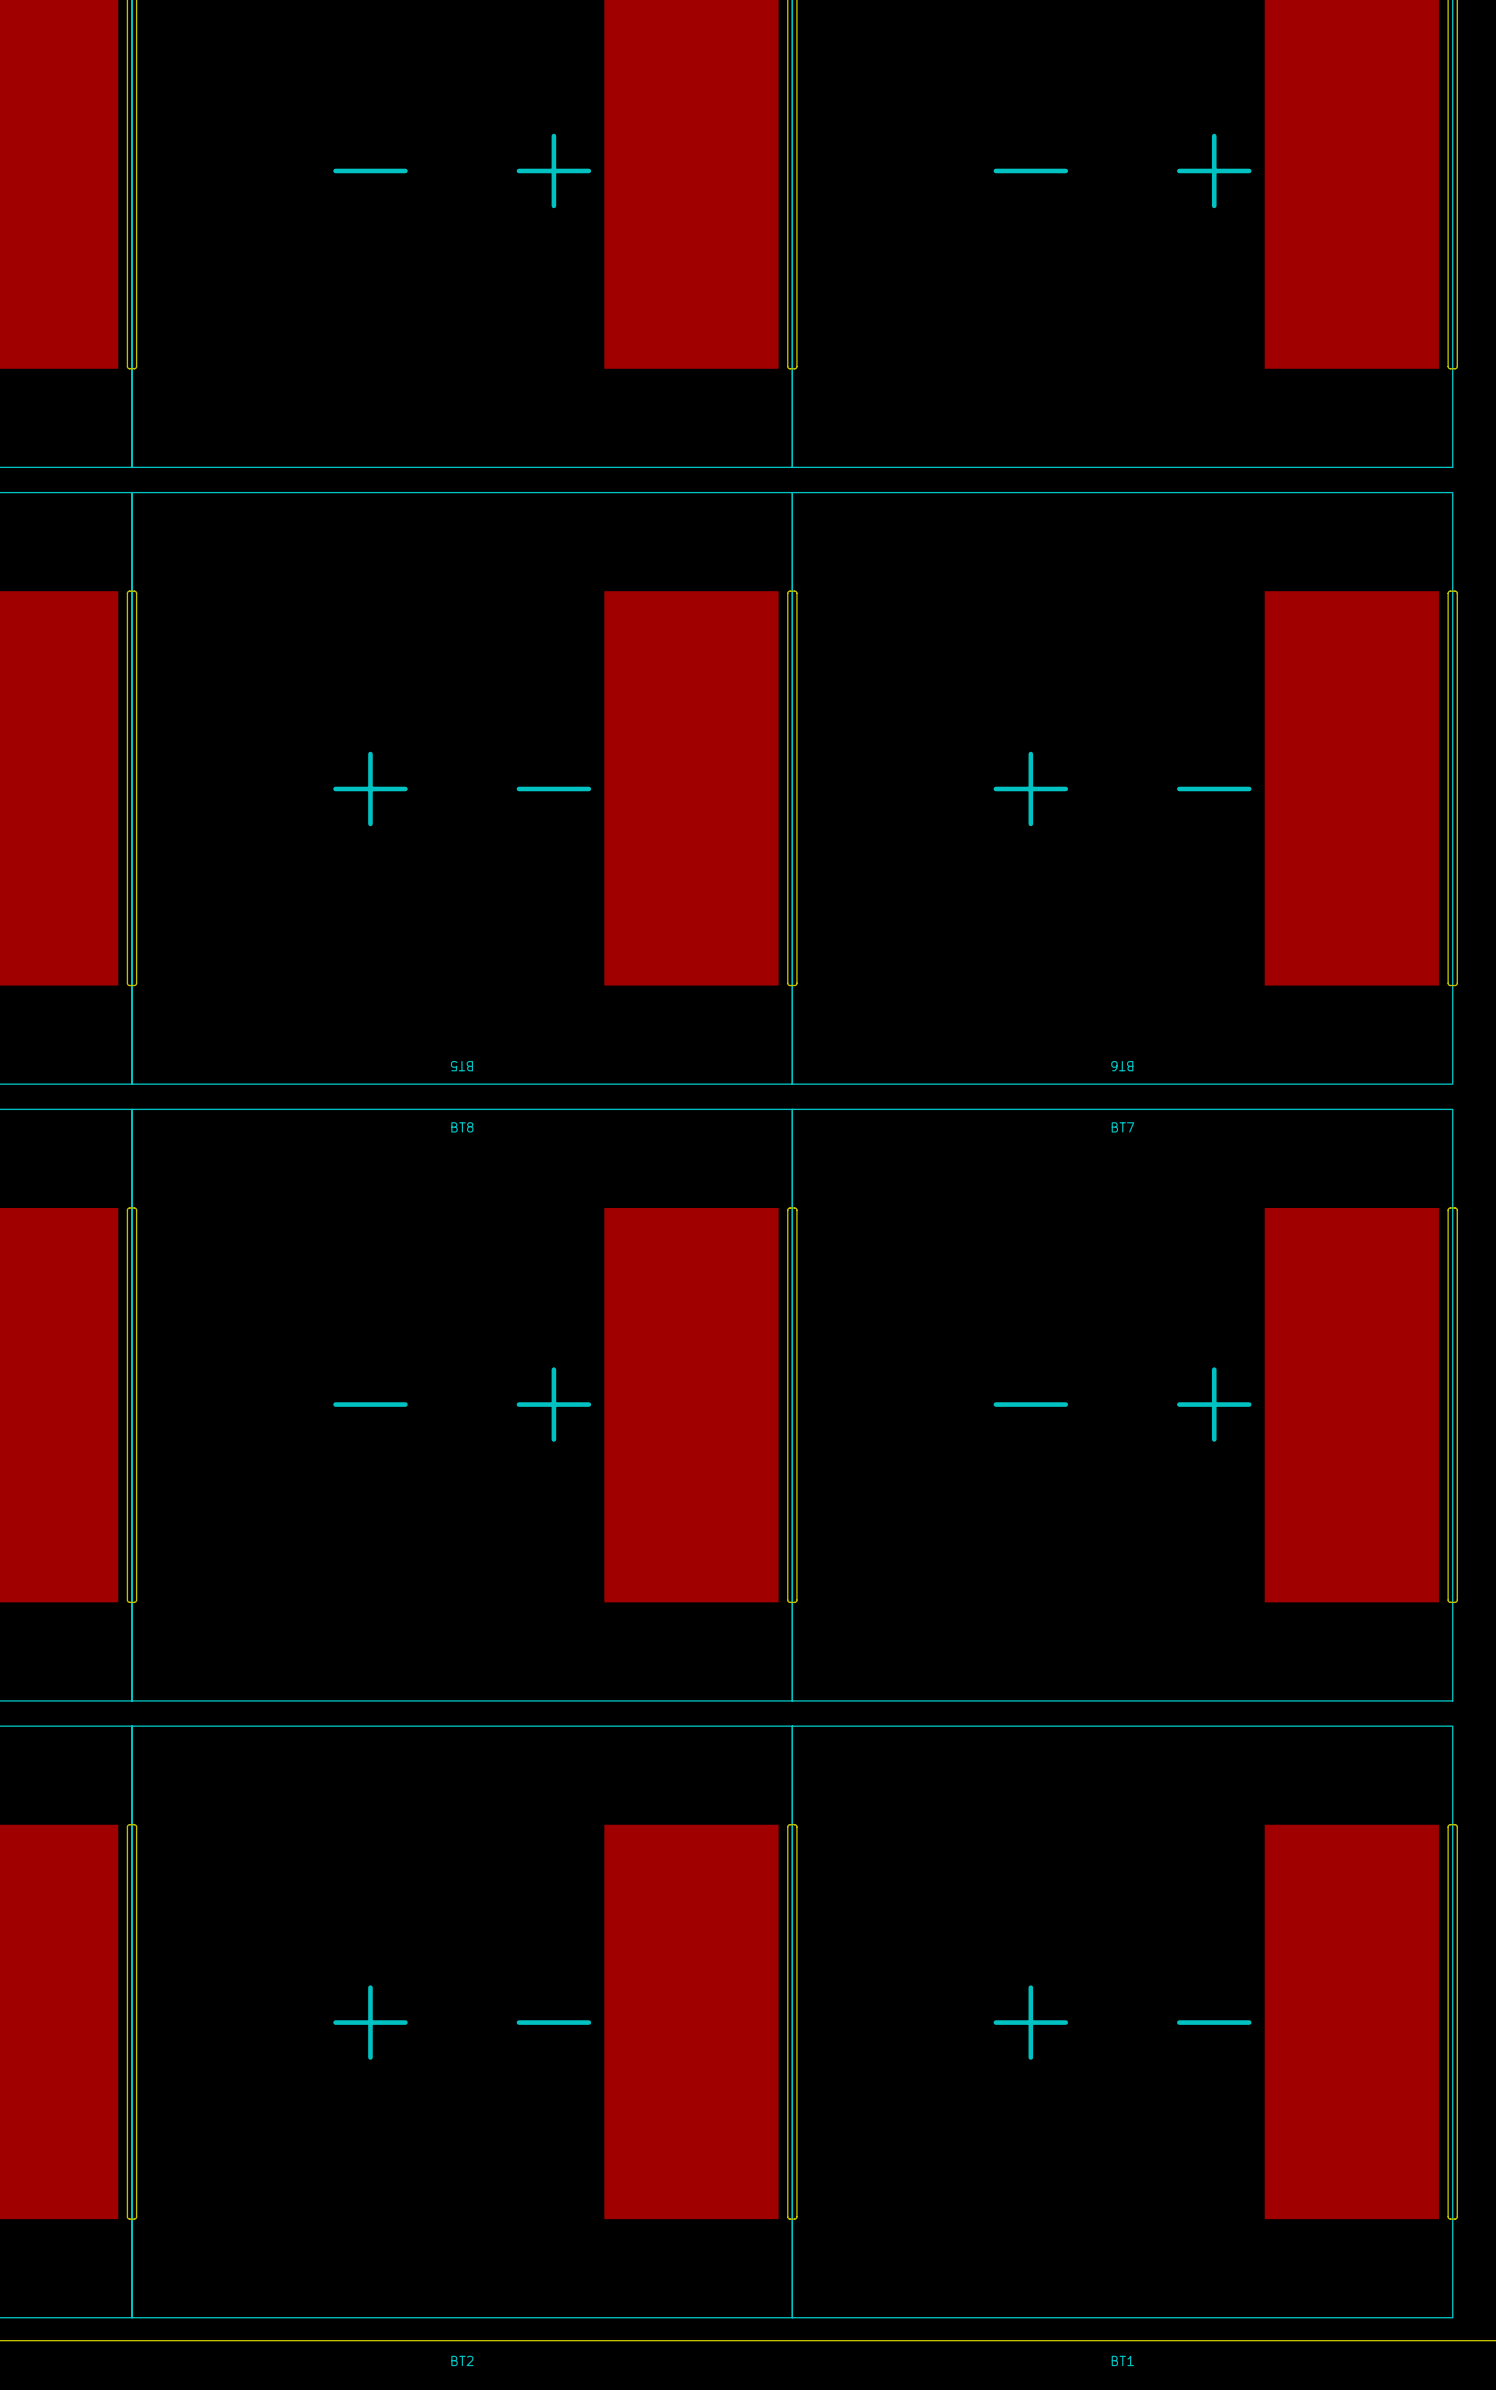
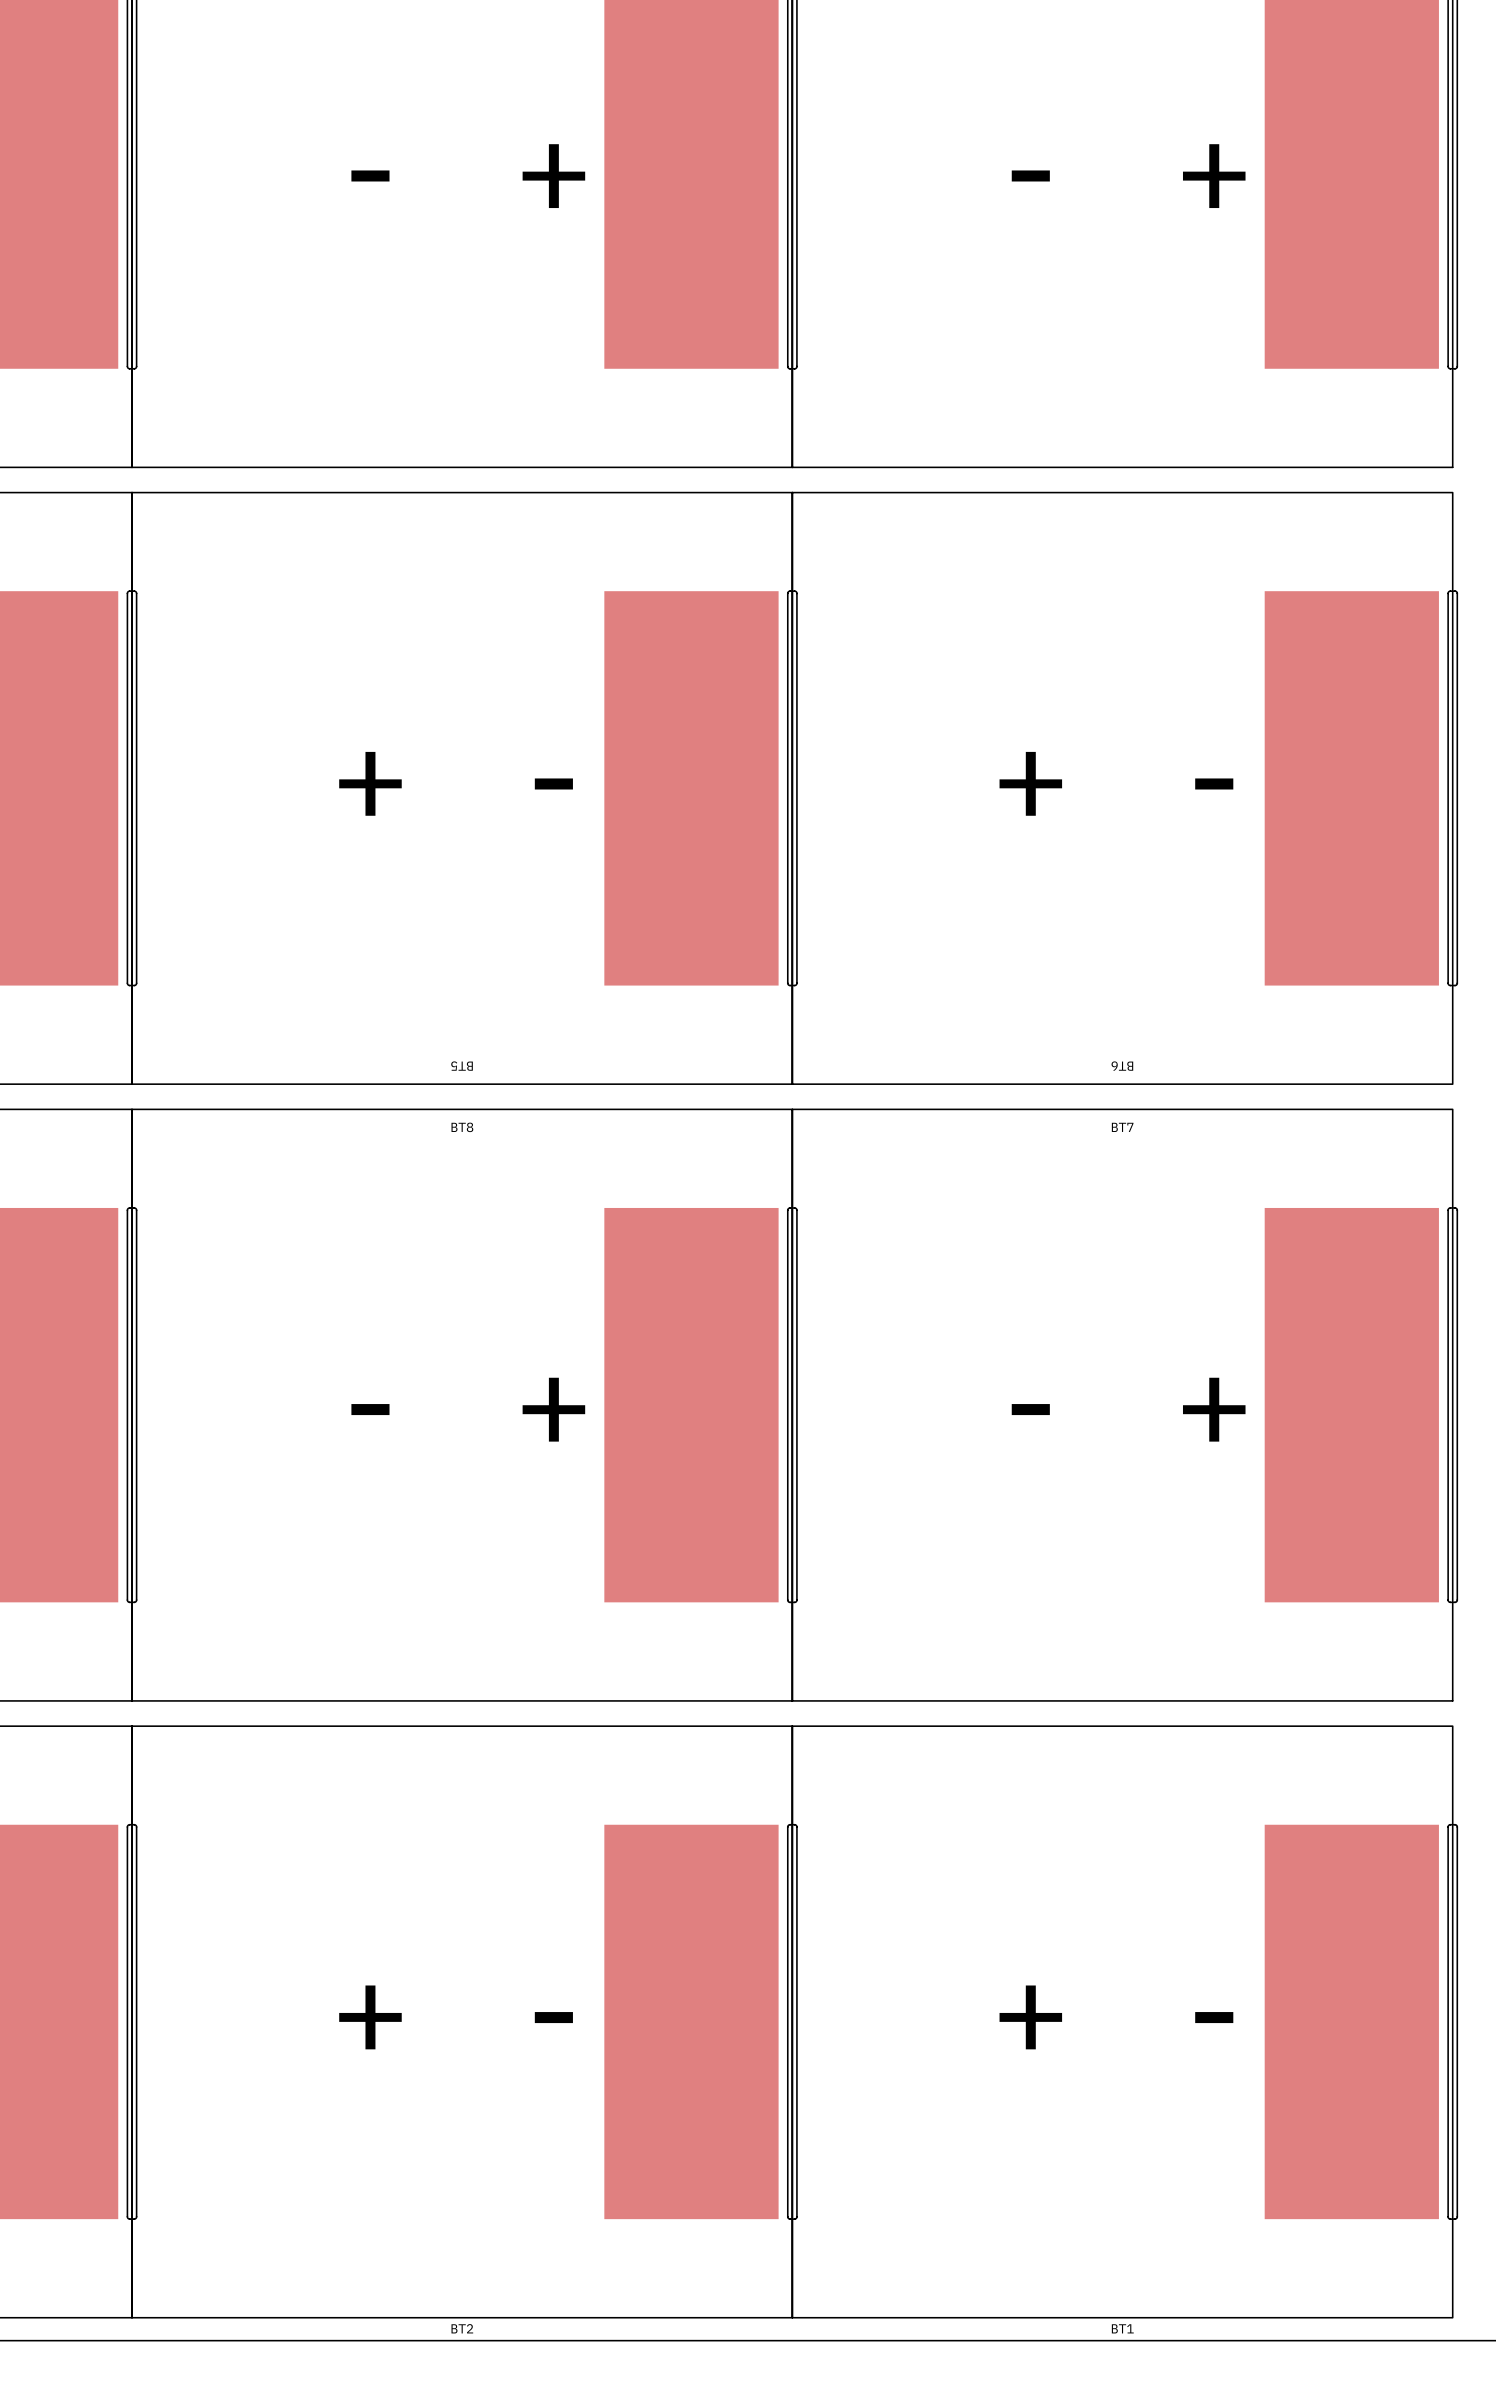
BT2 name position: BT2 (462, 2360) -> BT2 (462, 2328)
BT1 name position: BT1 (1122, 2360) -> BT1 (1122, 2328)

